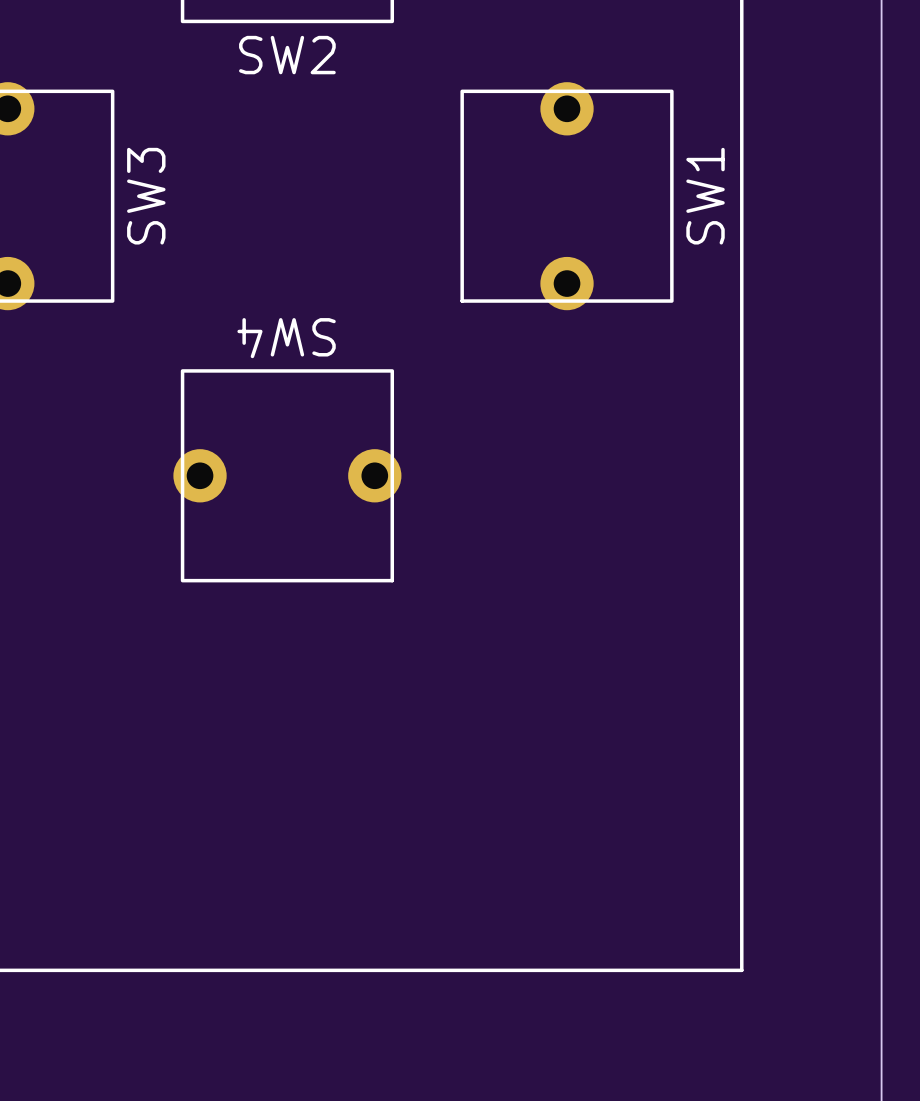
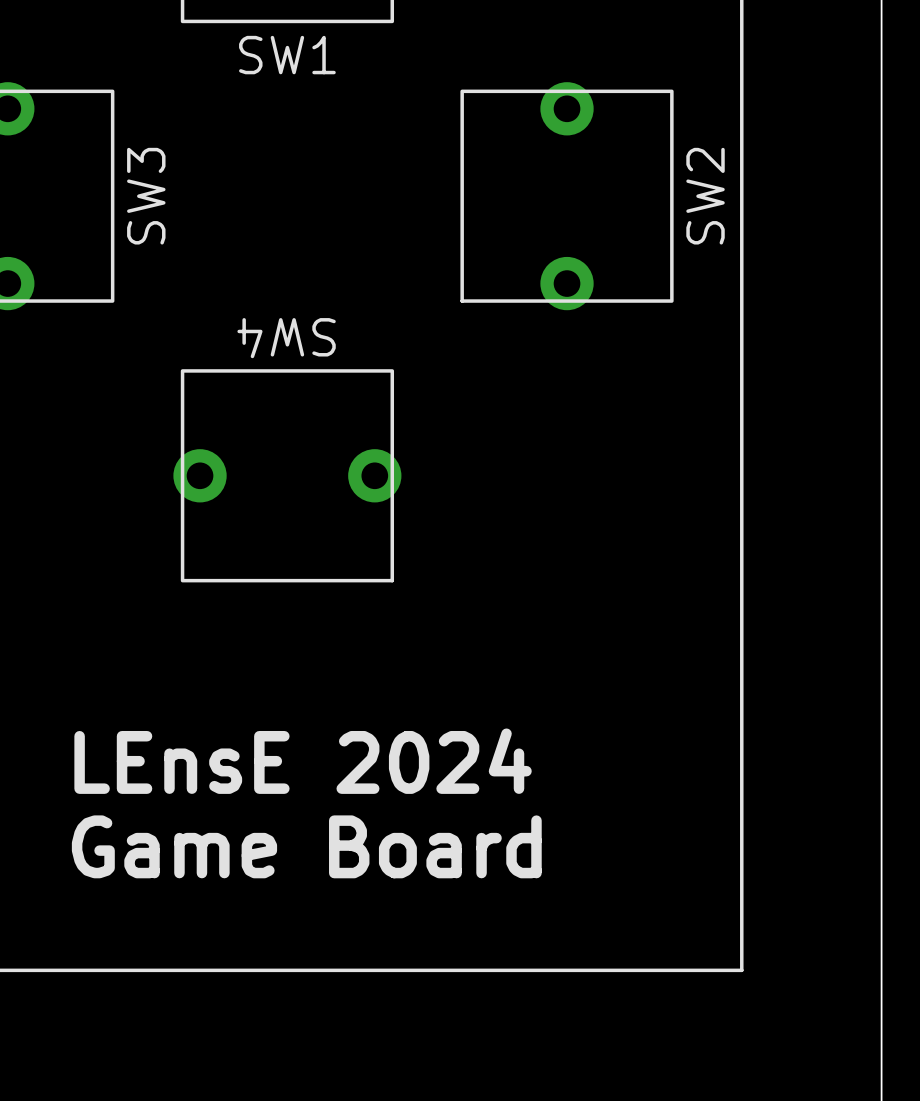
SW2 name: SW2 (287, 55) -> SW1 (287, 55)
SW1 name: SW1 (705, 196) -> SW2 (705, 196)
text: none -> LEnsE 2024 (303, 761)
text: none -> Game Board (306, 846)

